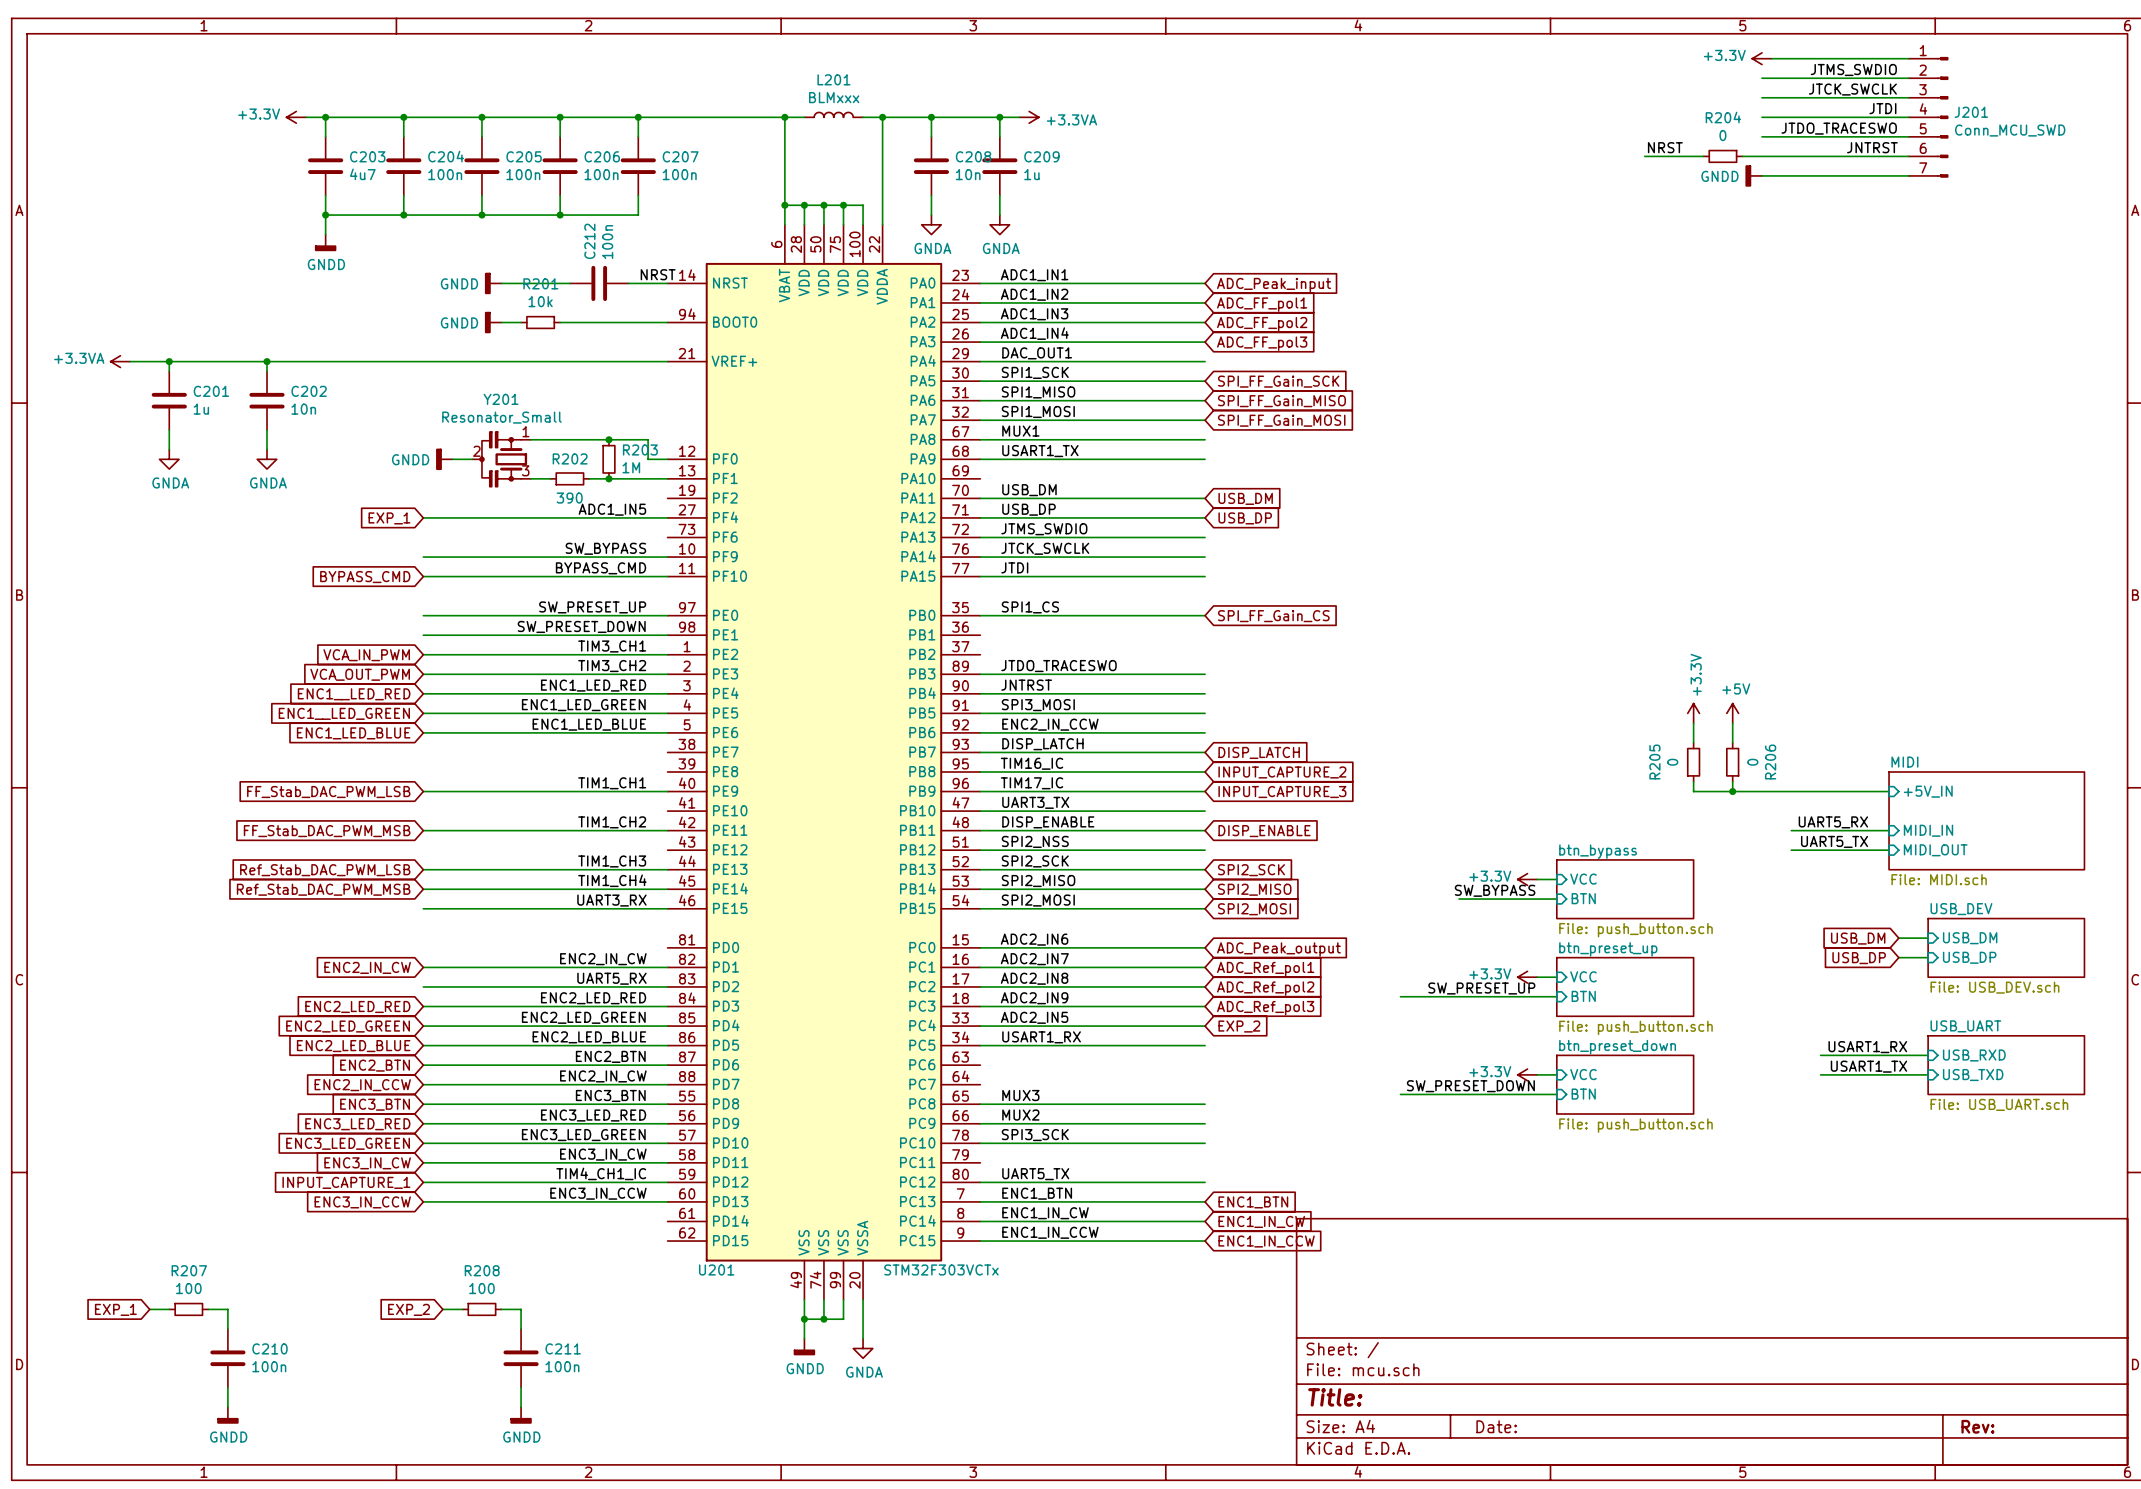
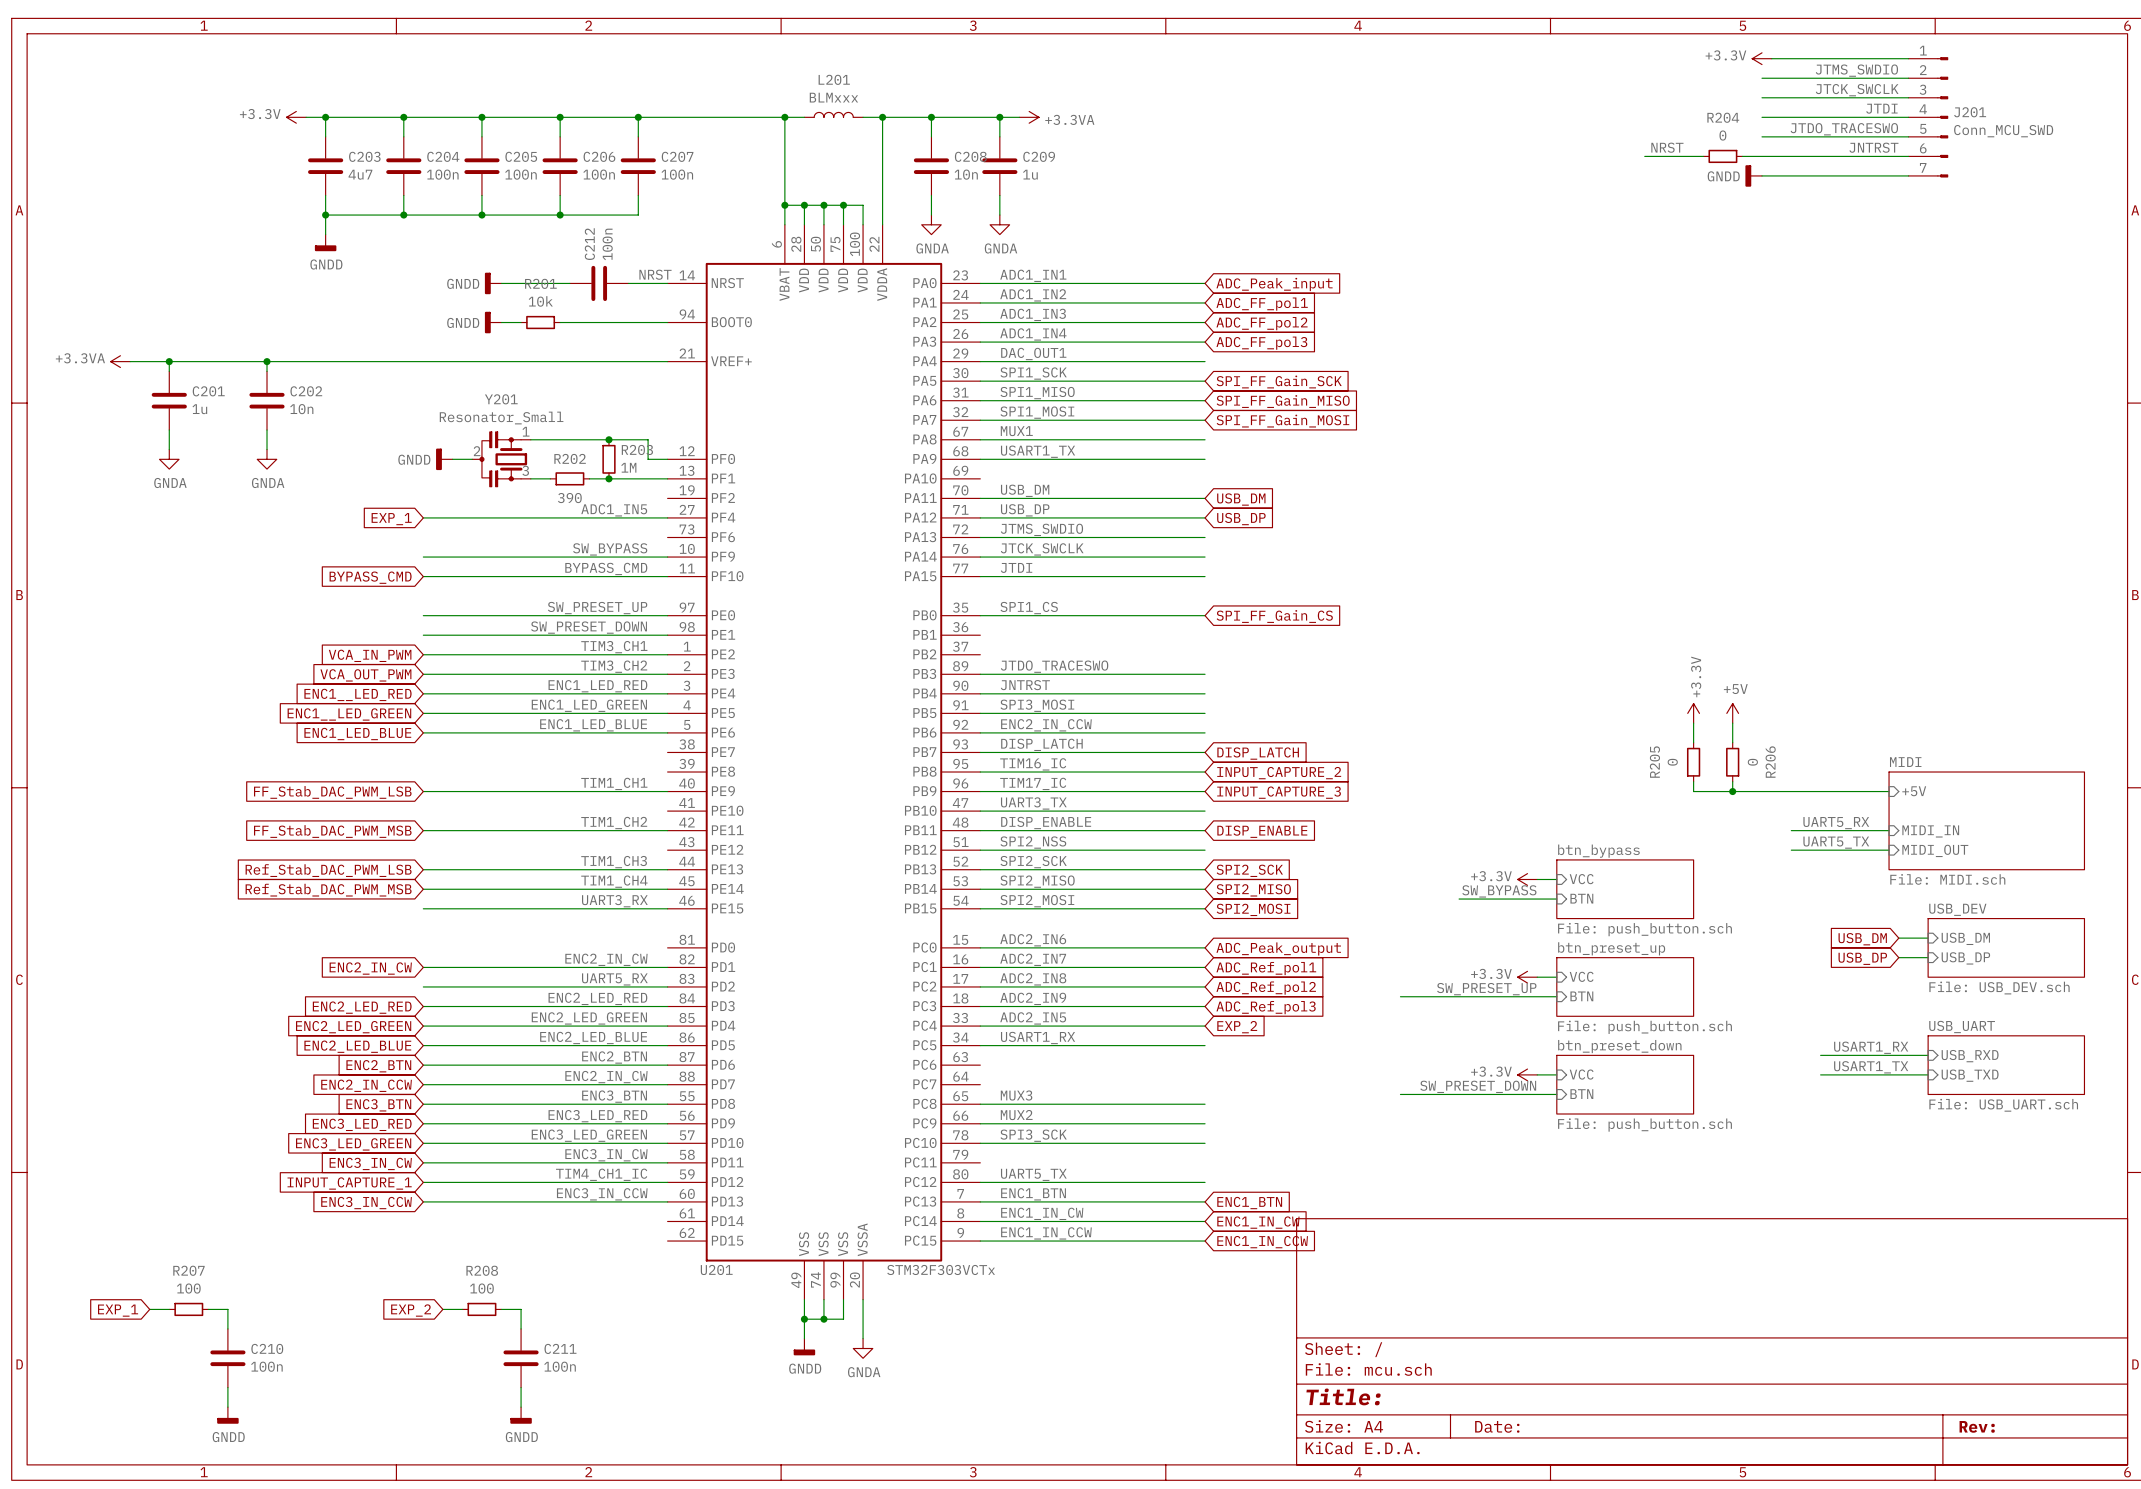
sheet pin: +5V_IN (1928, 791) -> +5V (1914, 791)

